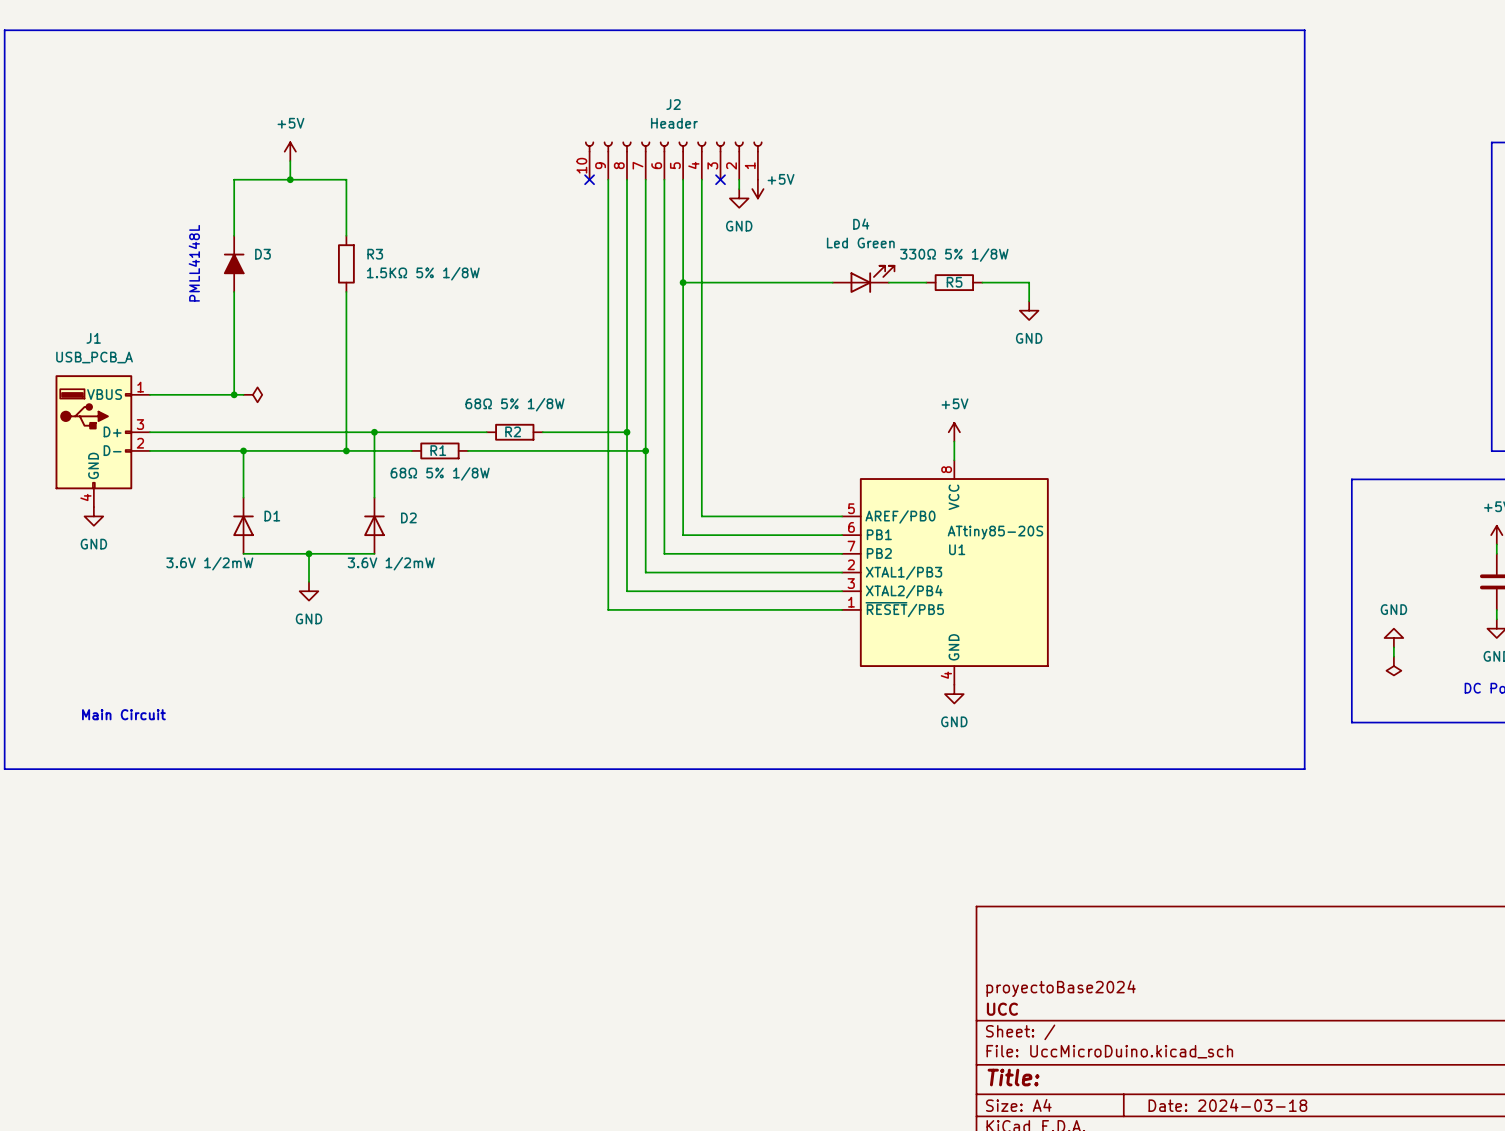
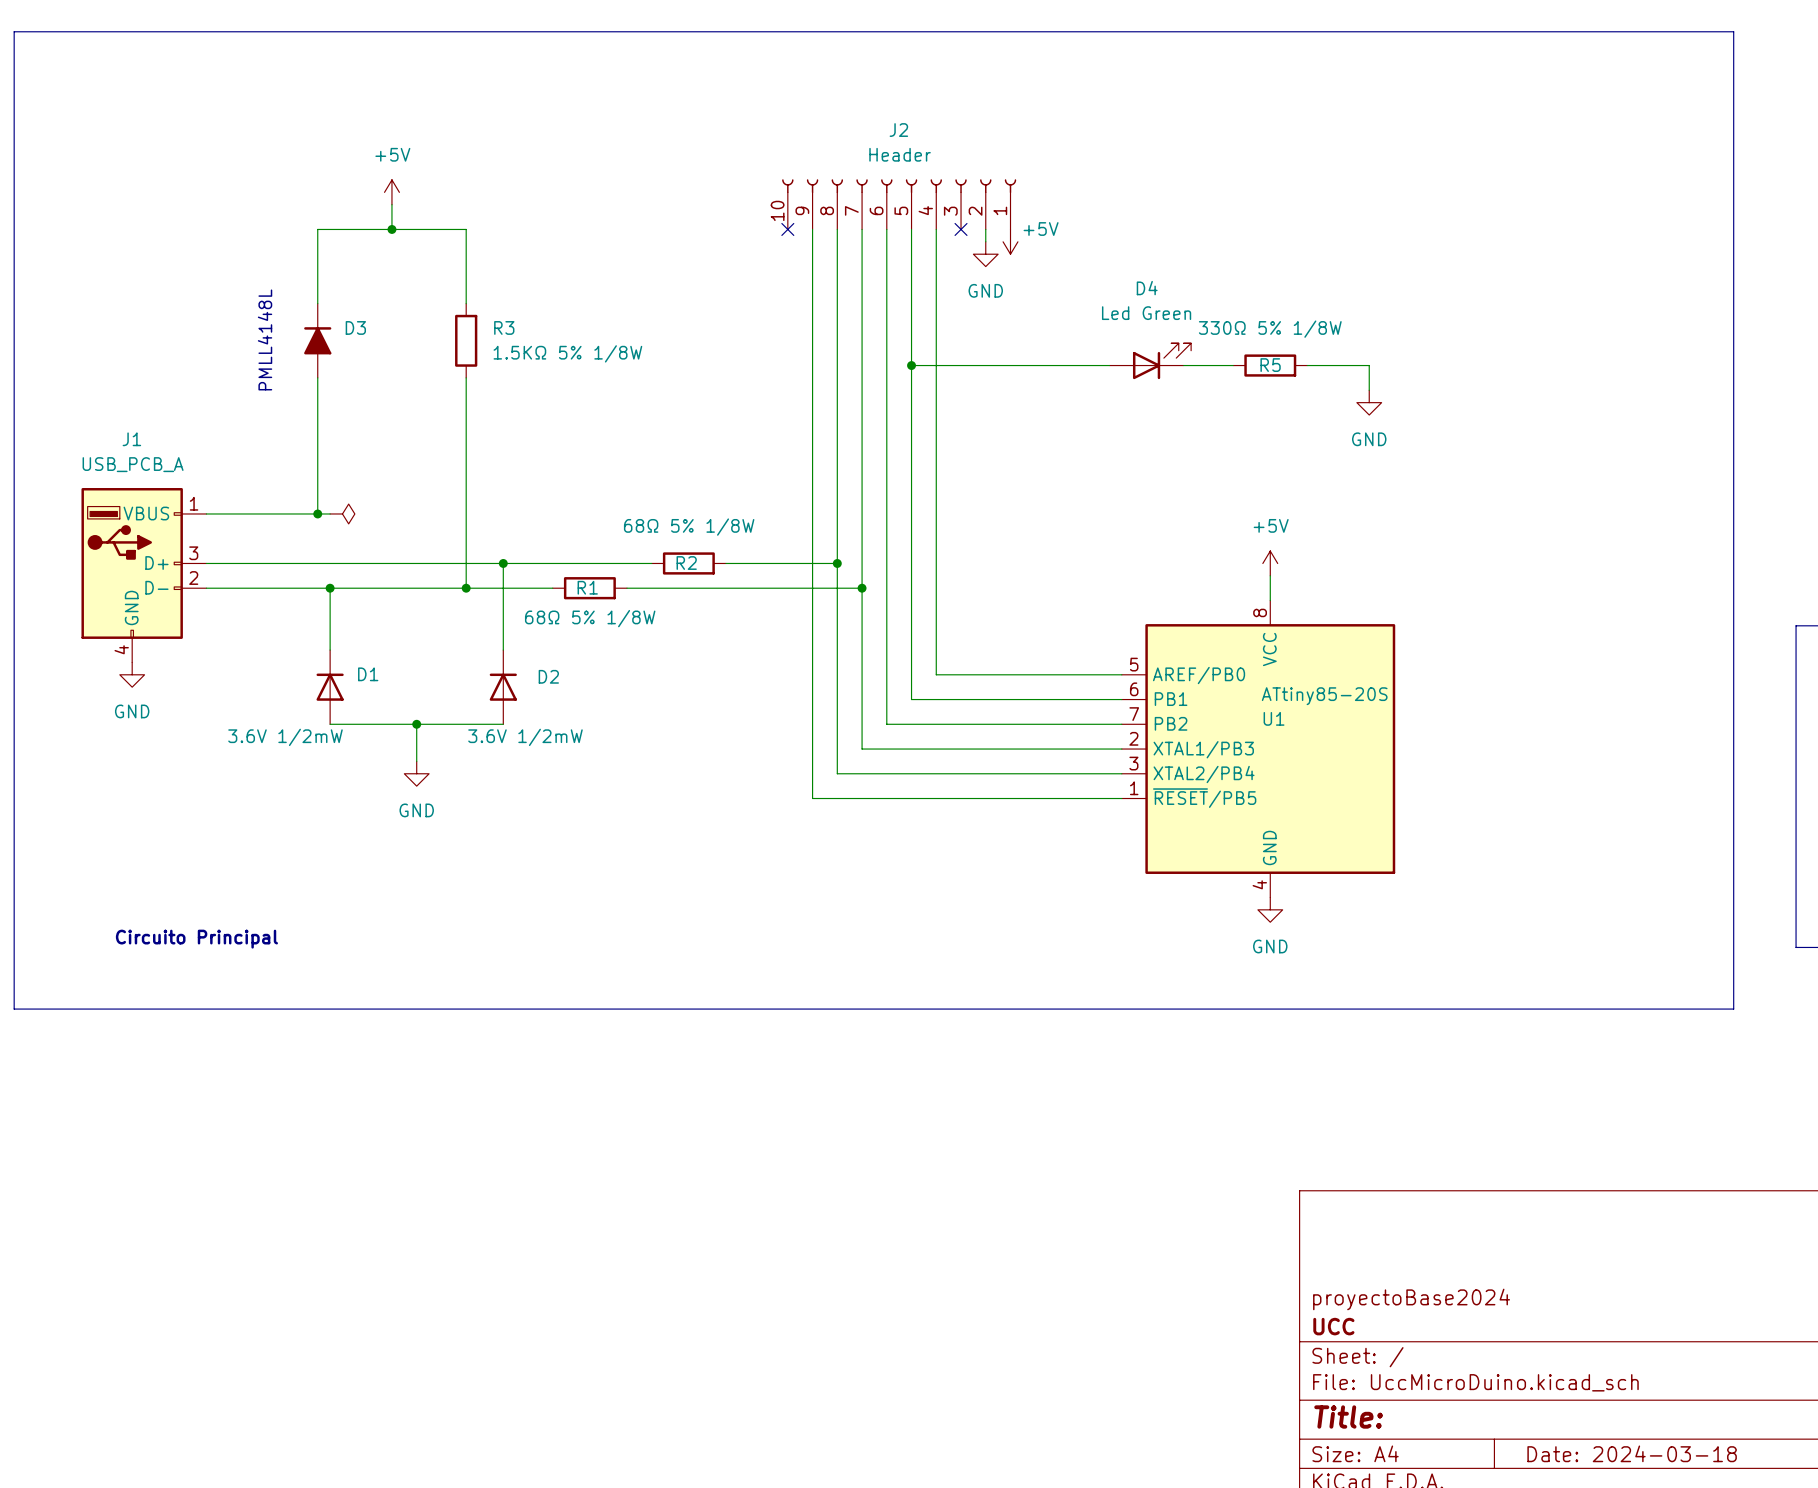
text: Main Circuit (123, 714) -> Circuito Principal (196, 939)

